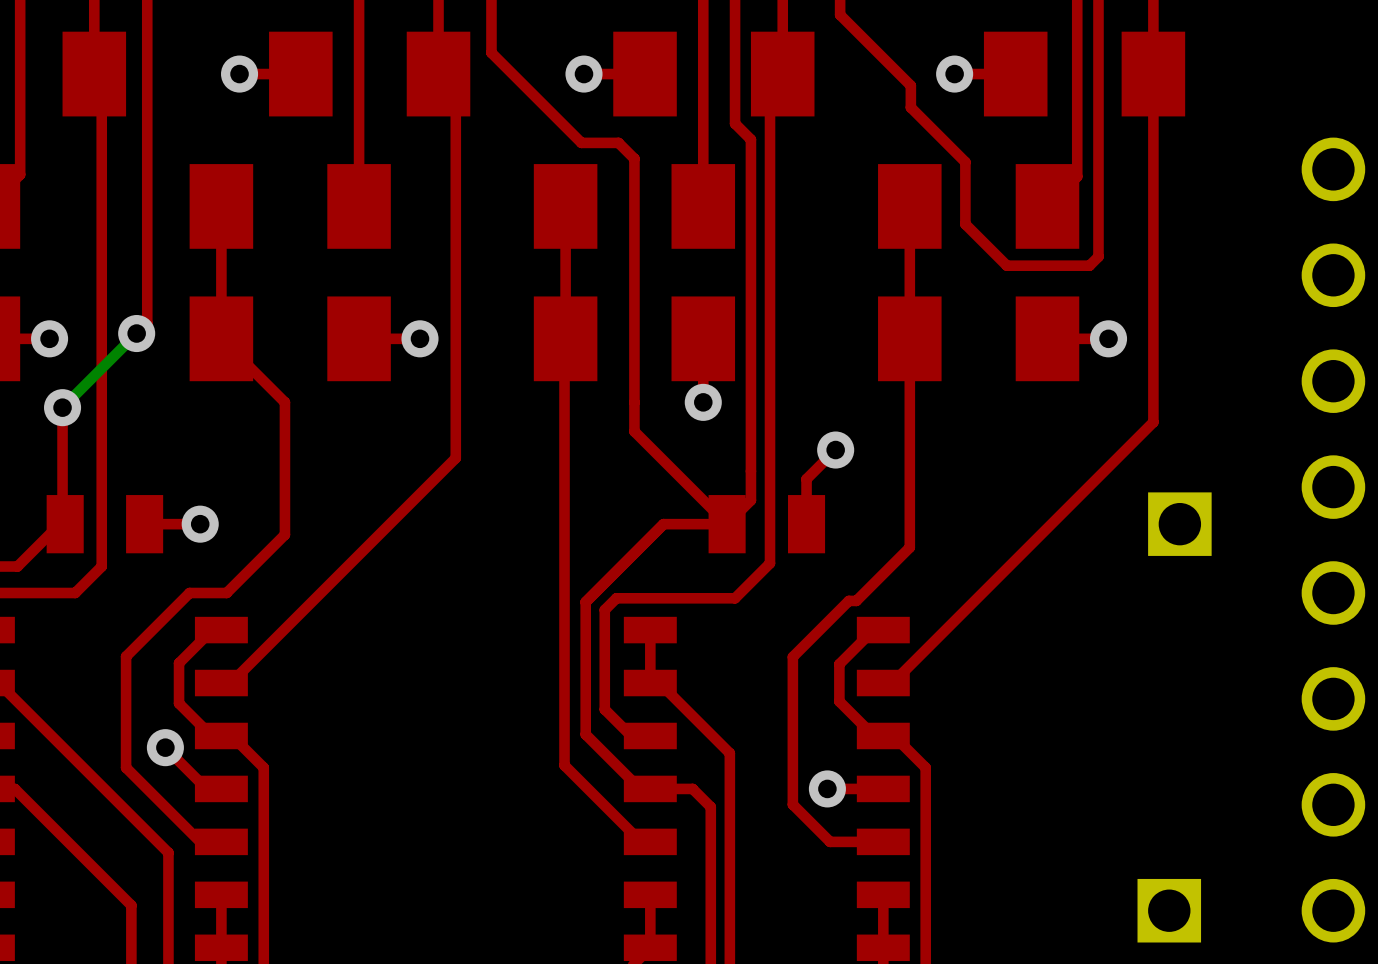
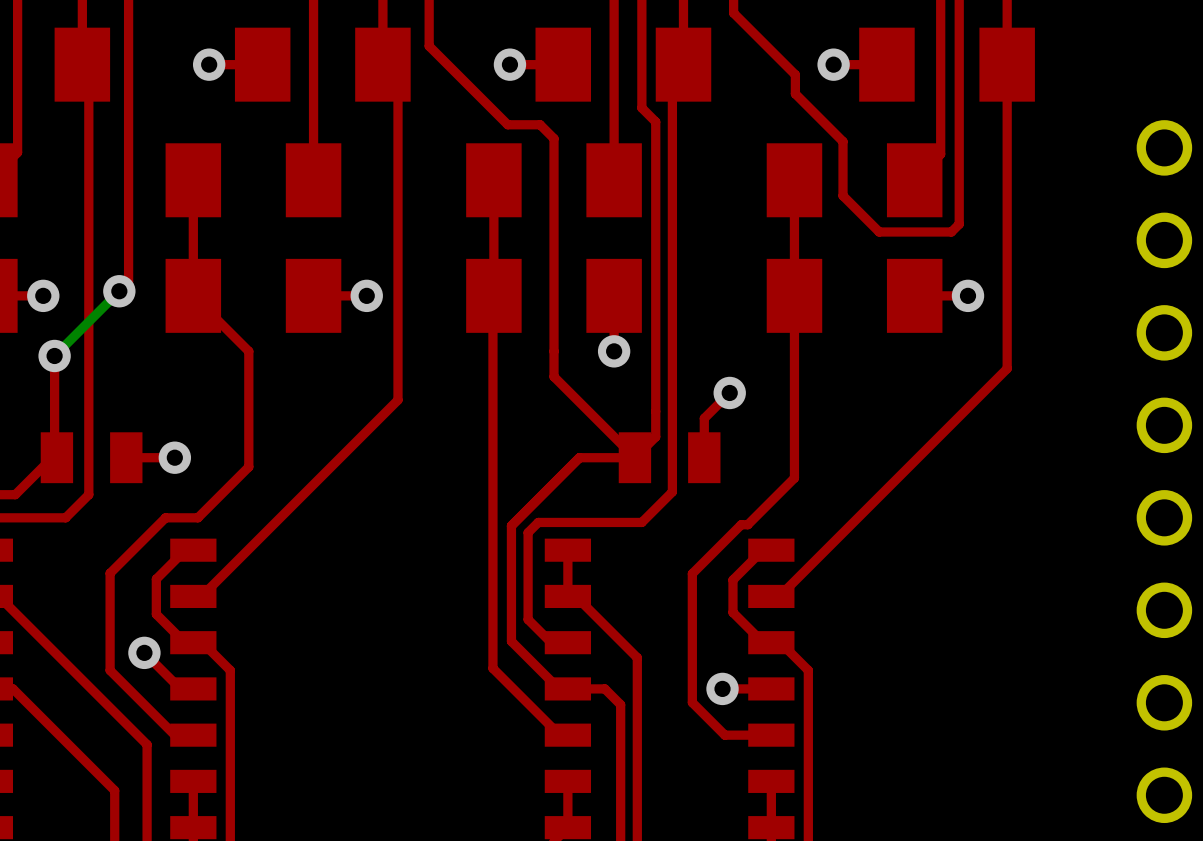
part: (1179, 524) -> none
part: (1169, 910) -> none

